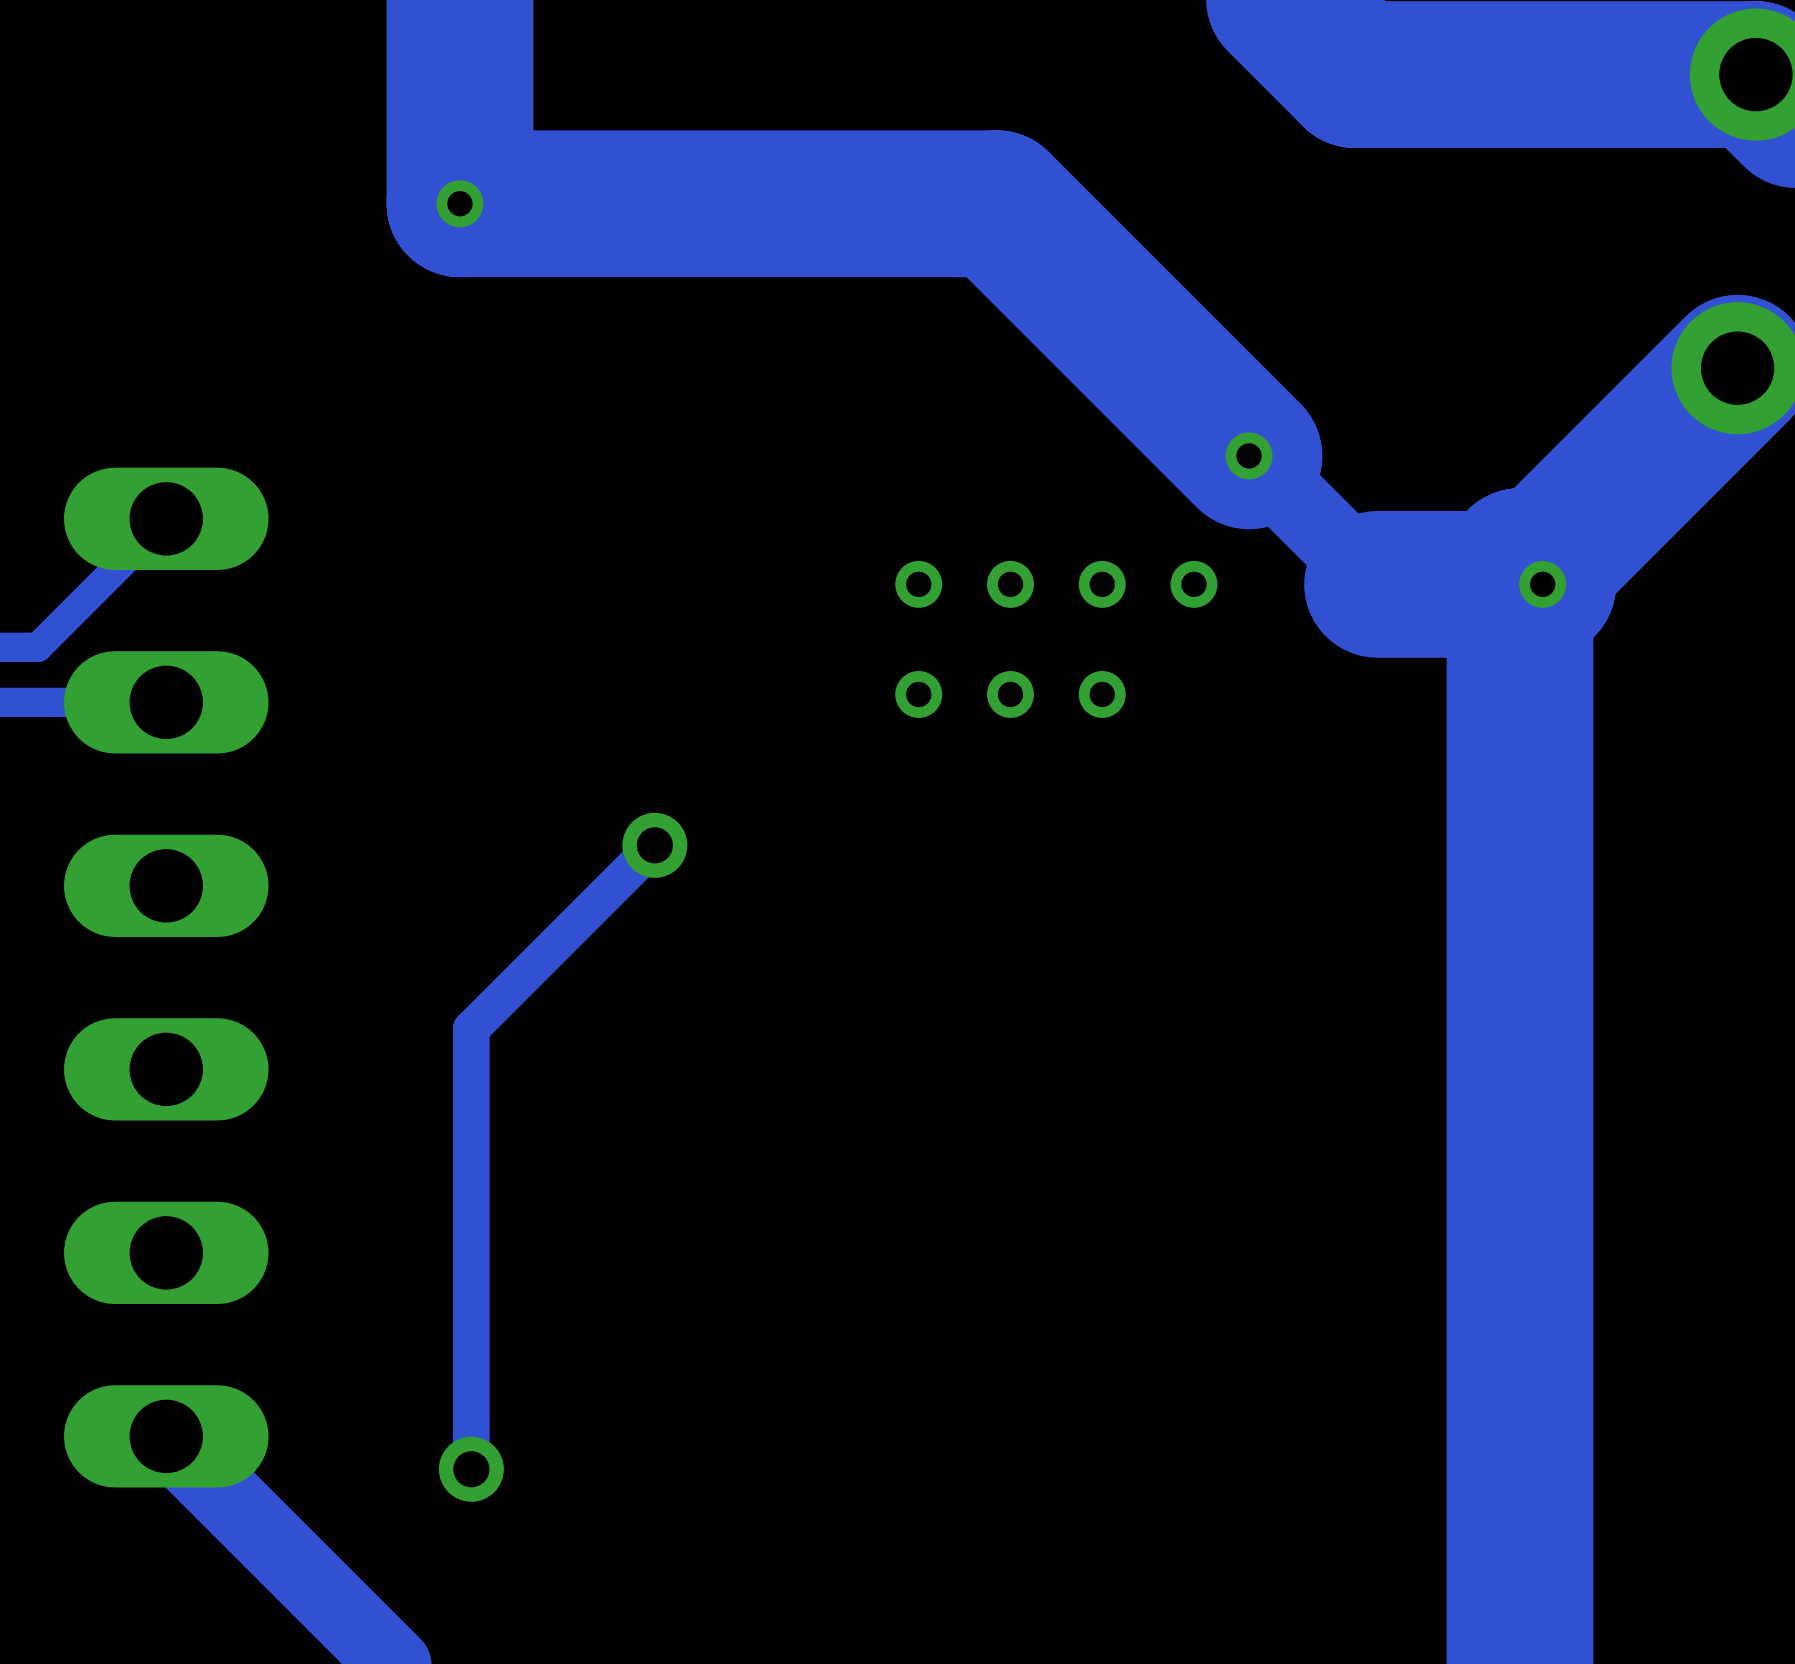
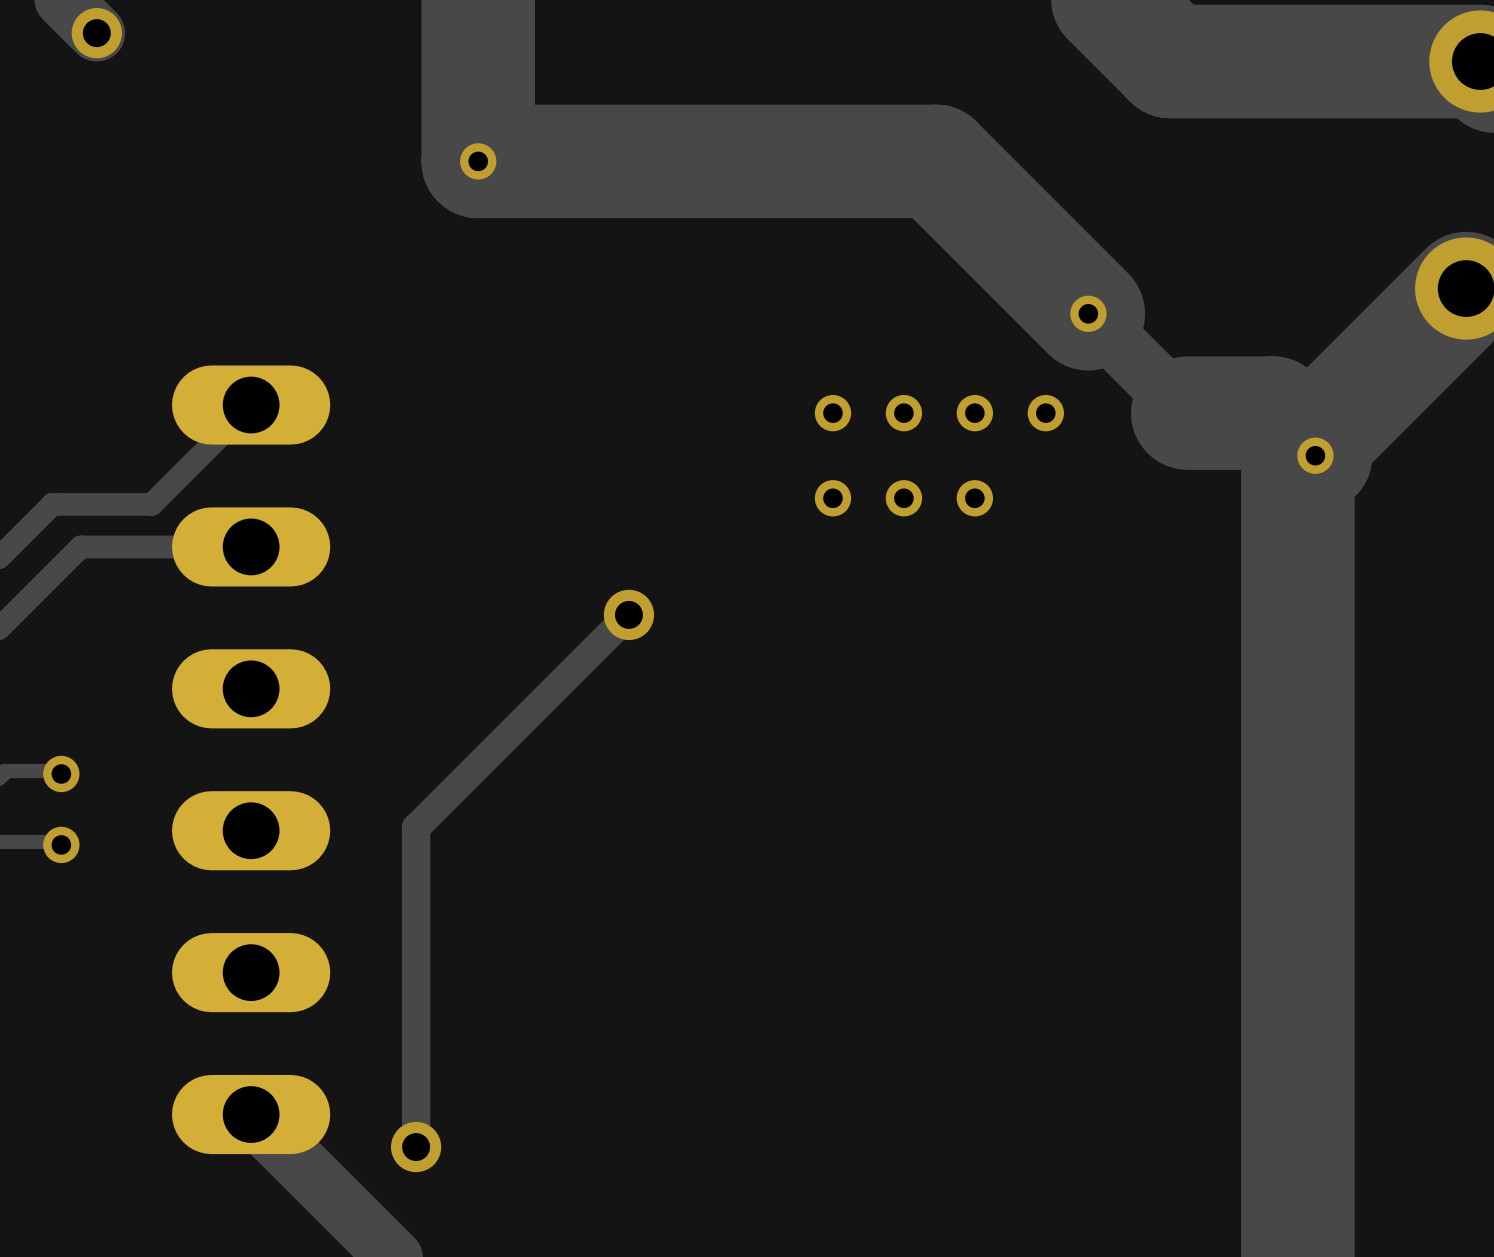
track: (996, 203) (1377, 584) (1542, 584) -> (893, 161) (935, 161) (1187, 413) (1272, 413) (1297, 438)
via: none -> (1088, 313)
via: (1249, 455) -> none
via: none -> (832, 413)
via: none -> (903, 413)
via: none -> (974, 413)
via: none -> (1045, 413)
via: (918, 584) -> none
via: (1010, 584) -> none
via: (1102, 584) -> none
via: (1193, 584) -> none
via: none -> (832, 498)
via: none -> (903, 498)
via: none -> (974, 498)
via: (918, 694) -> none
via: (1010, 694) -> none
via: (1102, 694) -> none
track: none -> (628, 614) (416, 827) (416, 1147)
track: (654, 845) (471, 1028) (471, 1469) -> none
via position: (654, 845) -> (628, 614)
via position: (471, 1469) -> (416, 1147)

